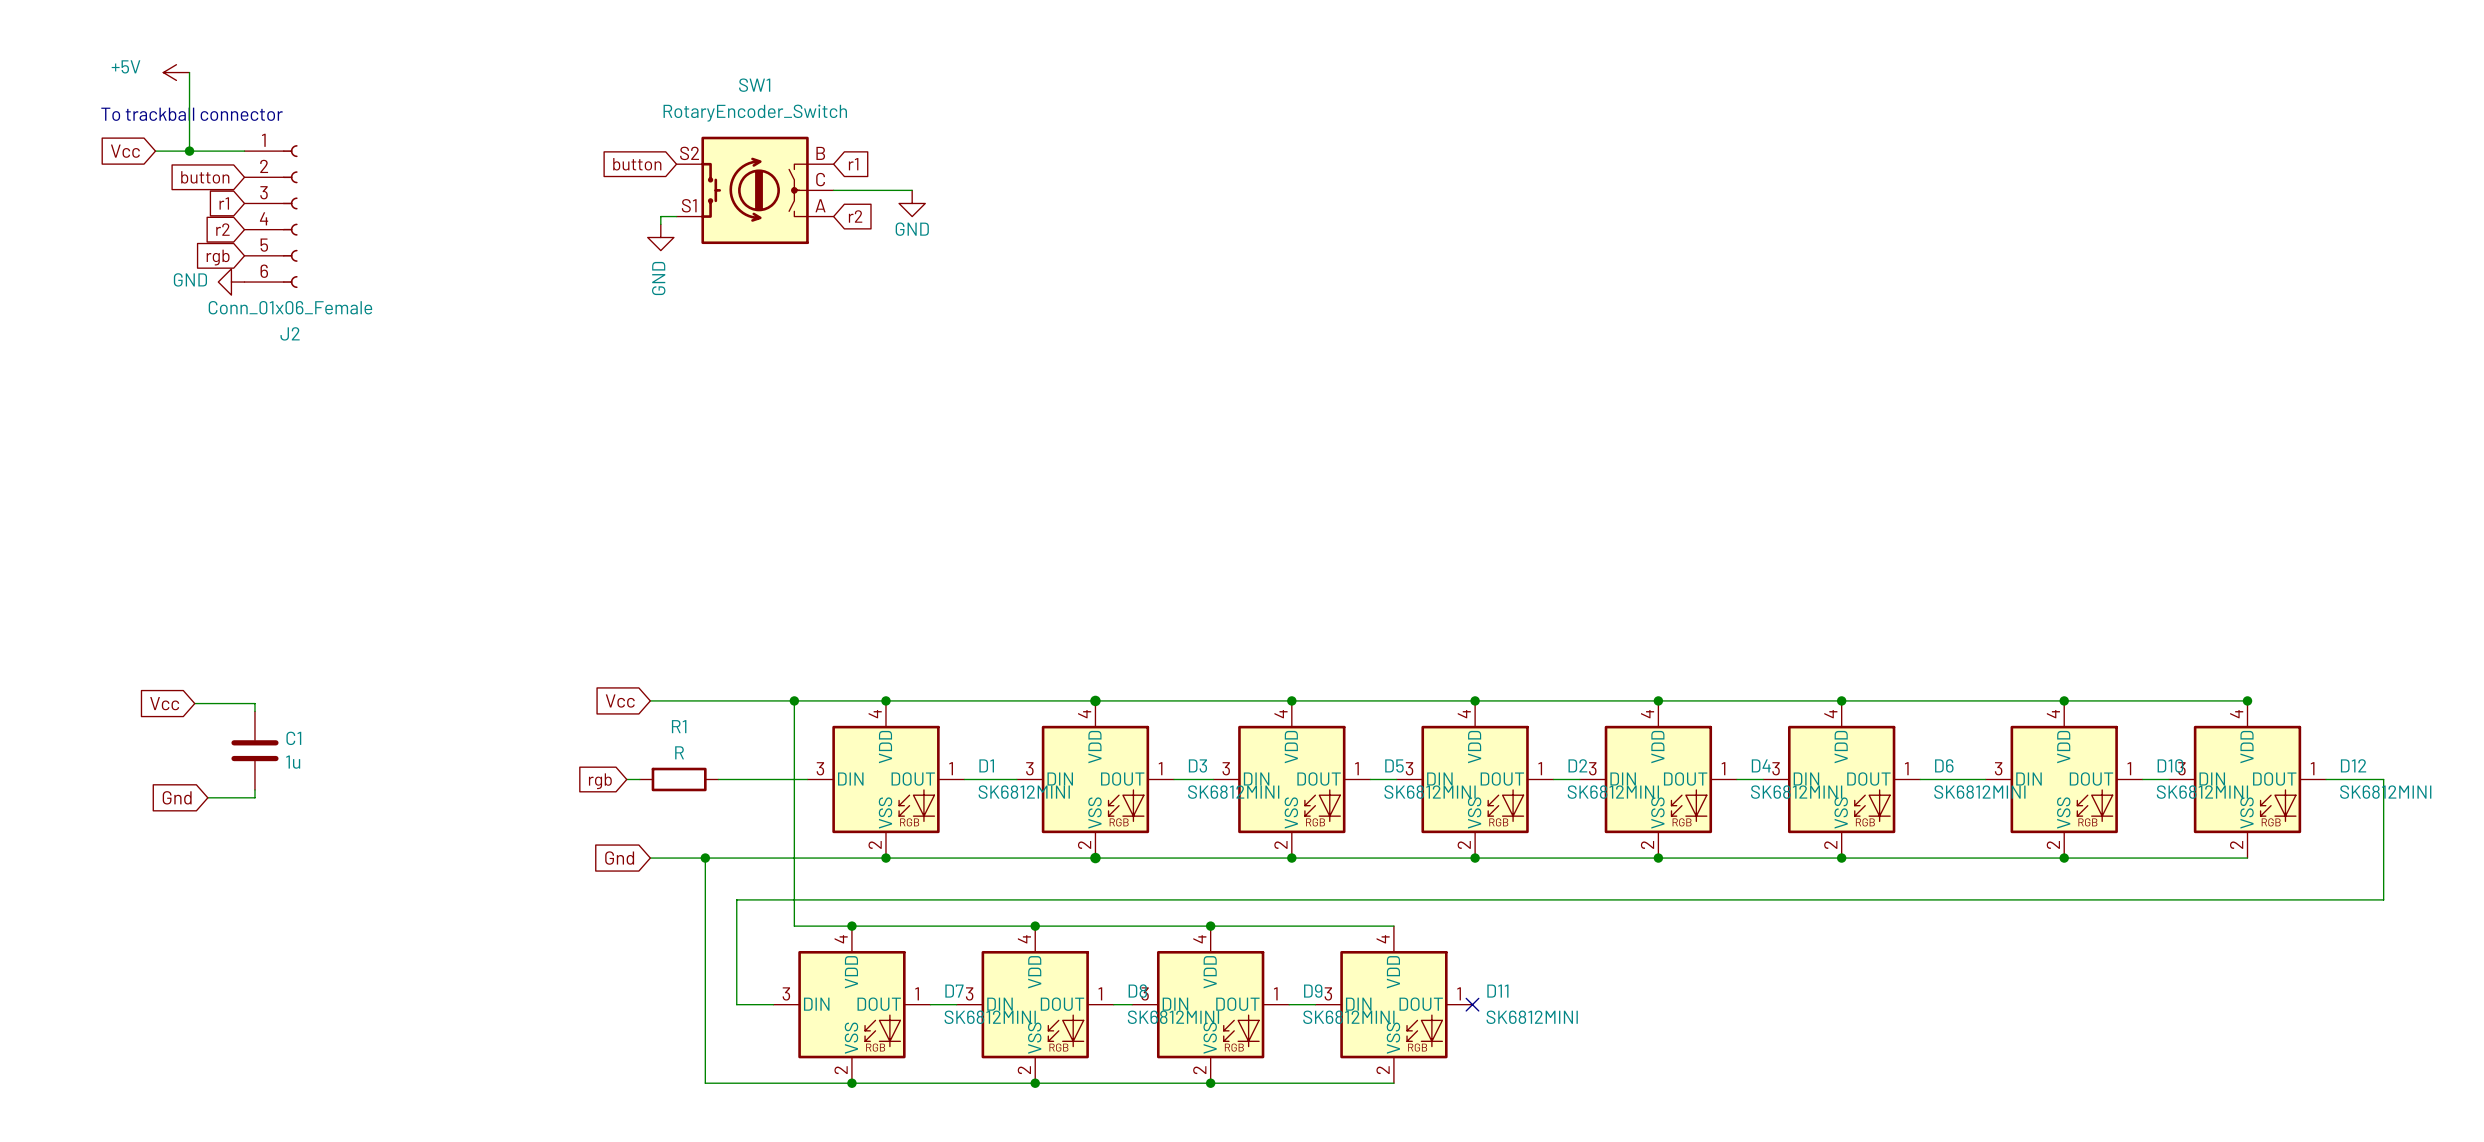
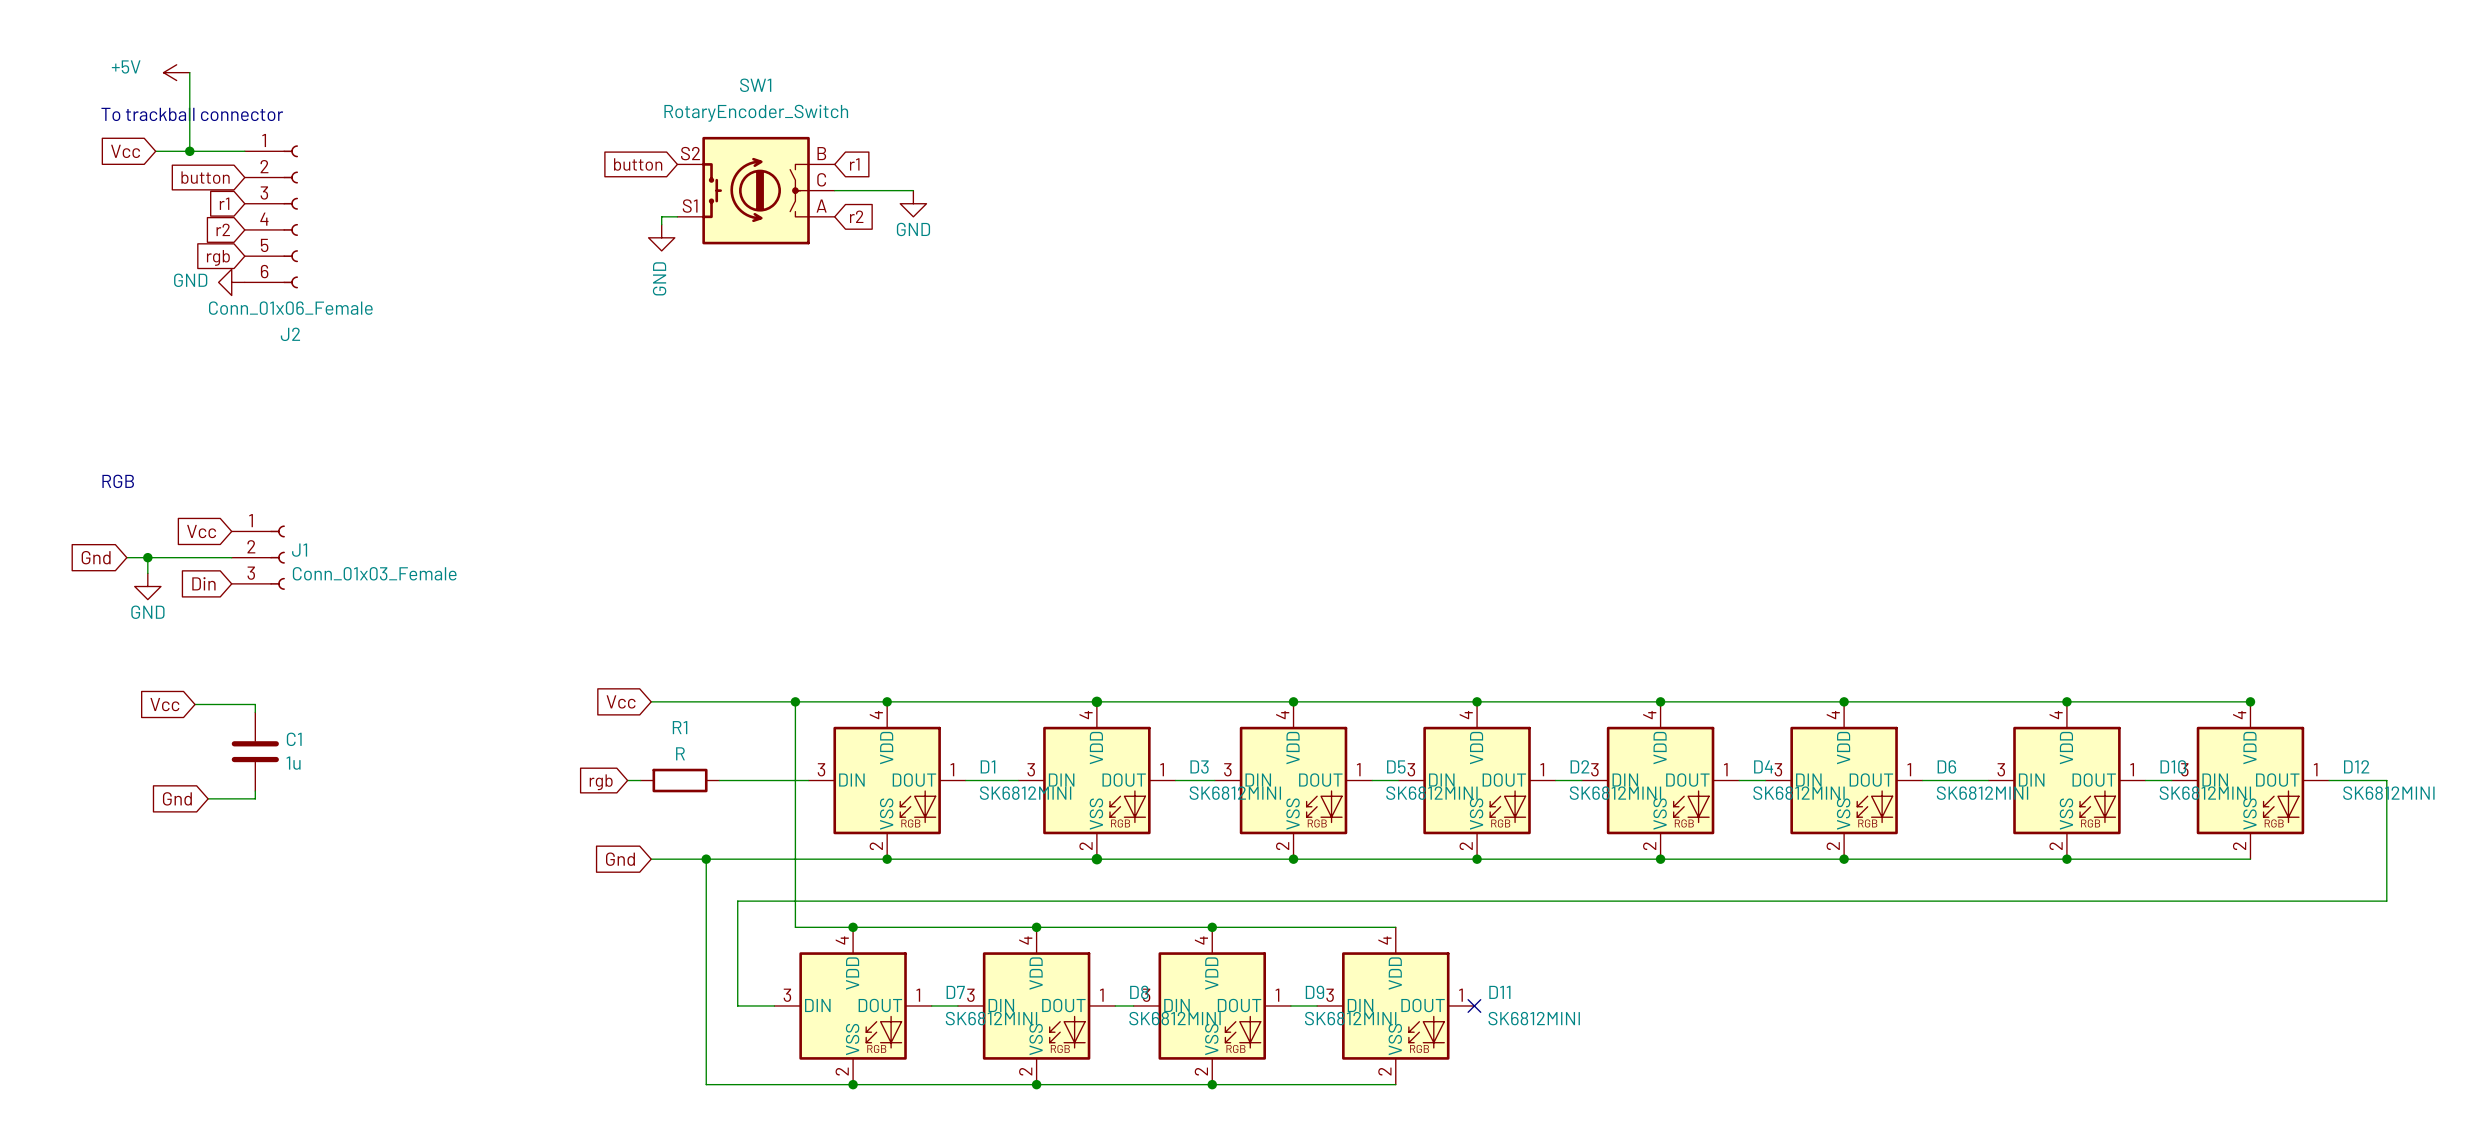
text: none -> RGB (118, 481)
global label: none -> Vcc (201, 531)
global label: none -> Gnd (96, 557)
wire: none -> (126, 557) (231, 557)
wire: none -> (147, 557) (147, 573)
junction: none -> (147, 557)
J1: none -> Conn_01x03_Female (258, 557)
global label: none -> Din (203, 583)
power symbol: none -> GND (147, 586)

